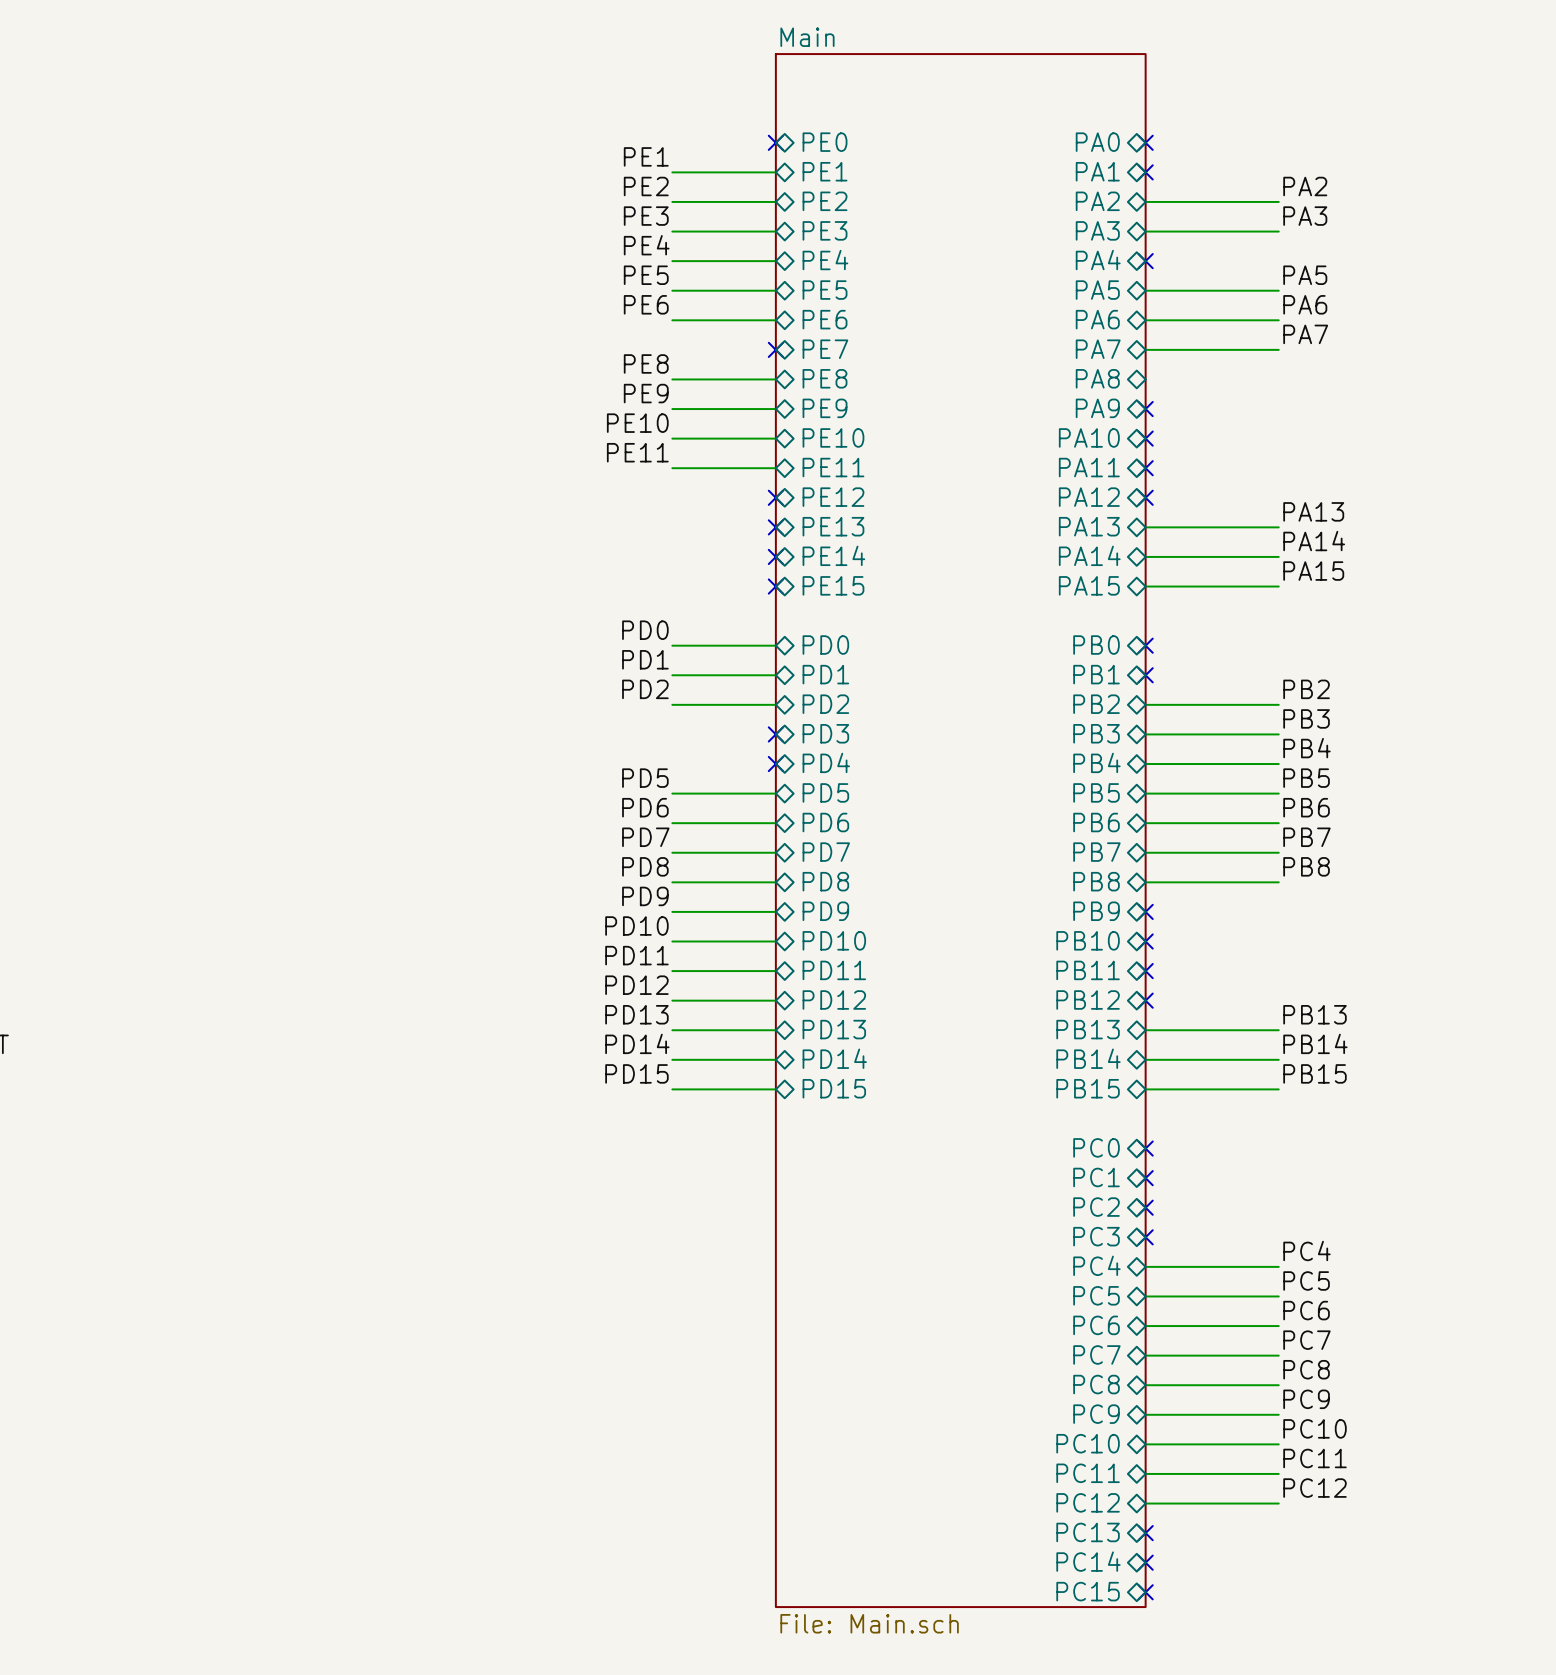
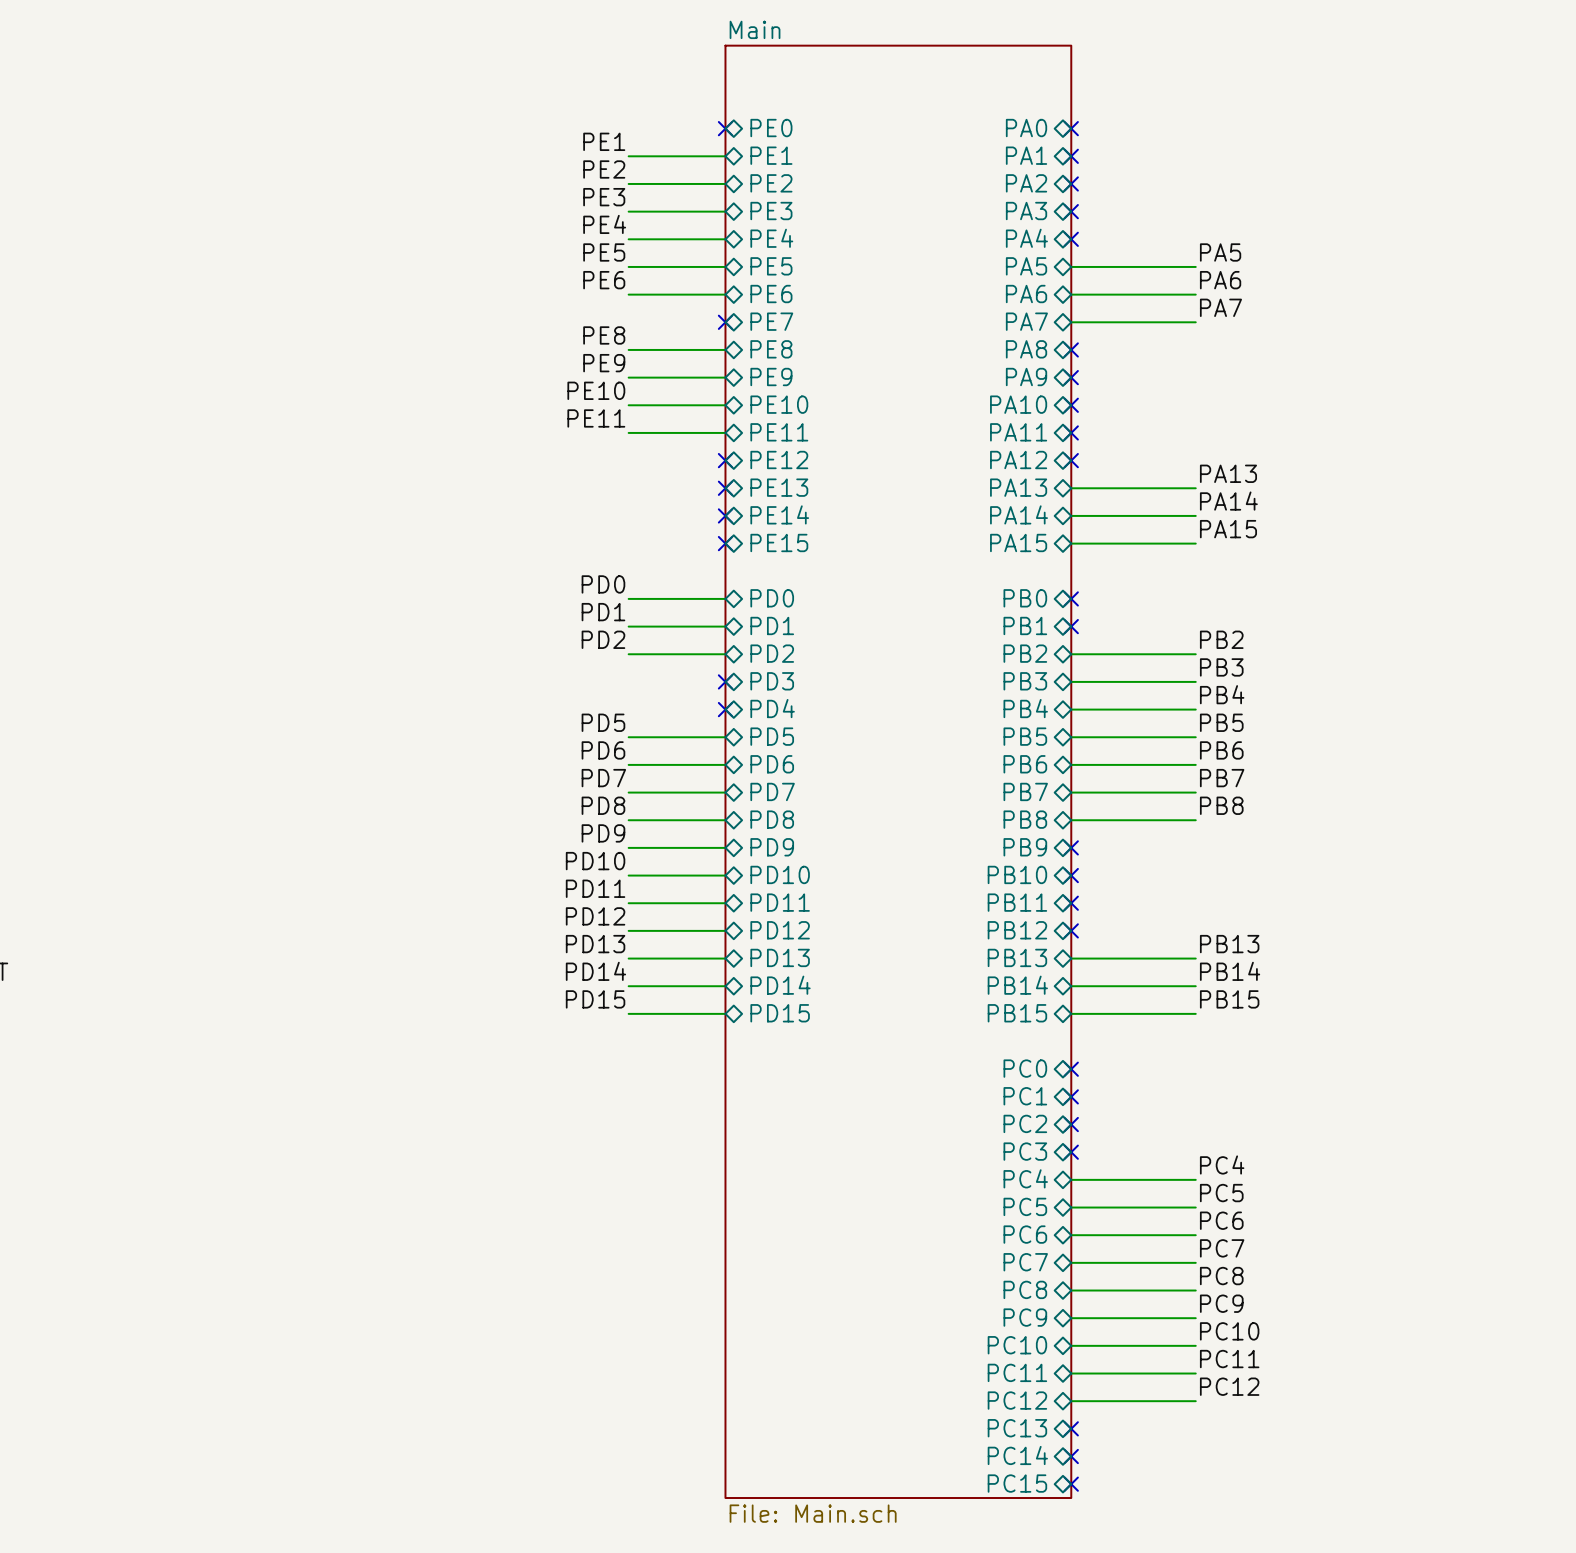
label: PA2 (1305, 186) -> none
wire: (1145, 201) (1278, 201) -> none
no-connect mark: none -> (1071, 183)
label: PA3 (1305, 216) -> none
wire: (1145, 231) (1278, 231) -> none
no-connect mark: none -> (1071, 211)
no-connect mark: none -> (1071, 349)

